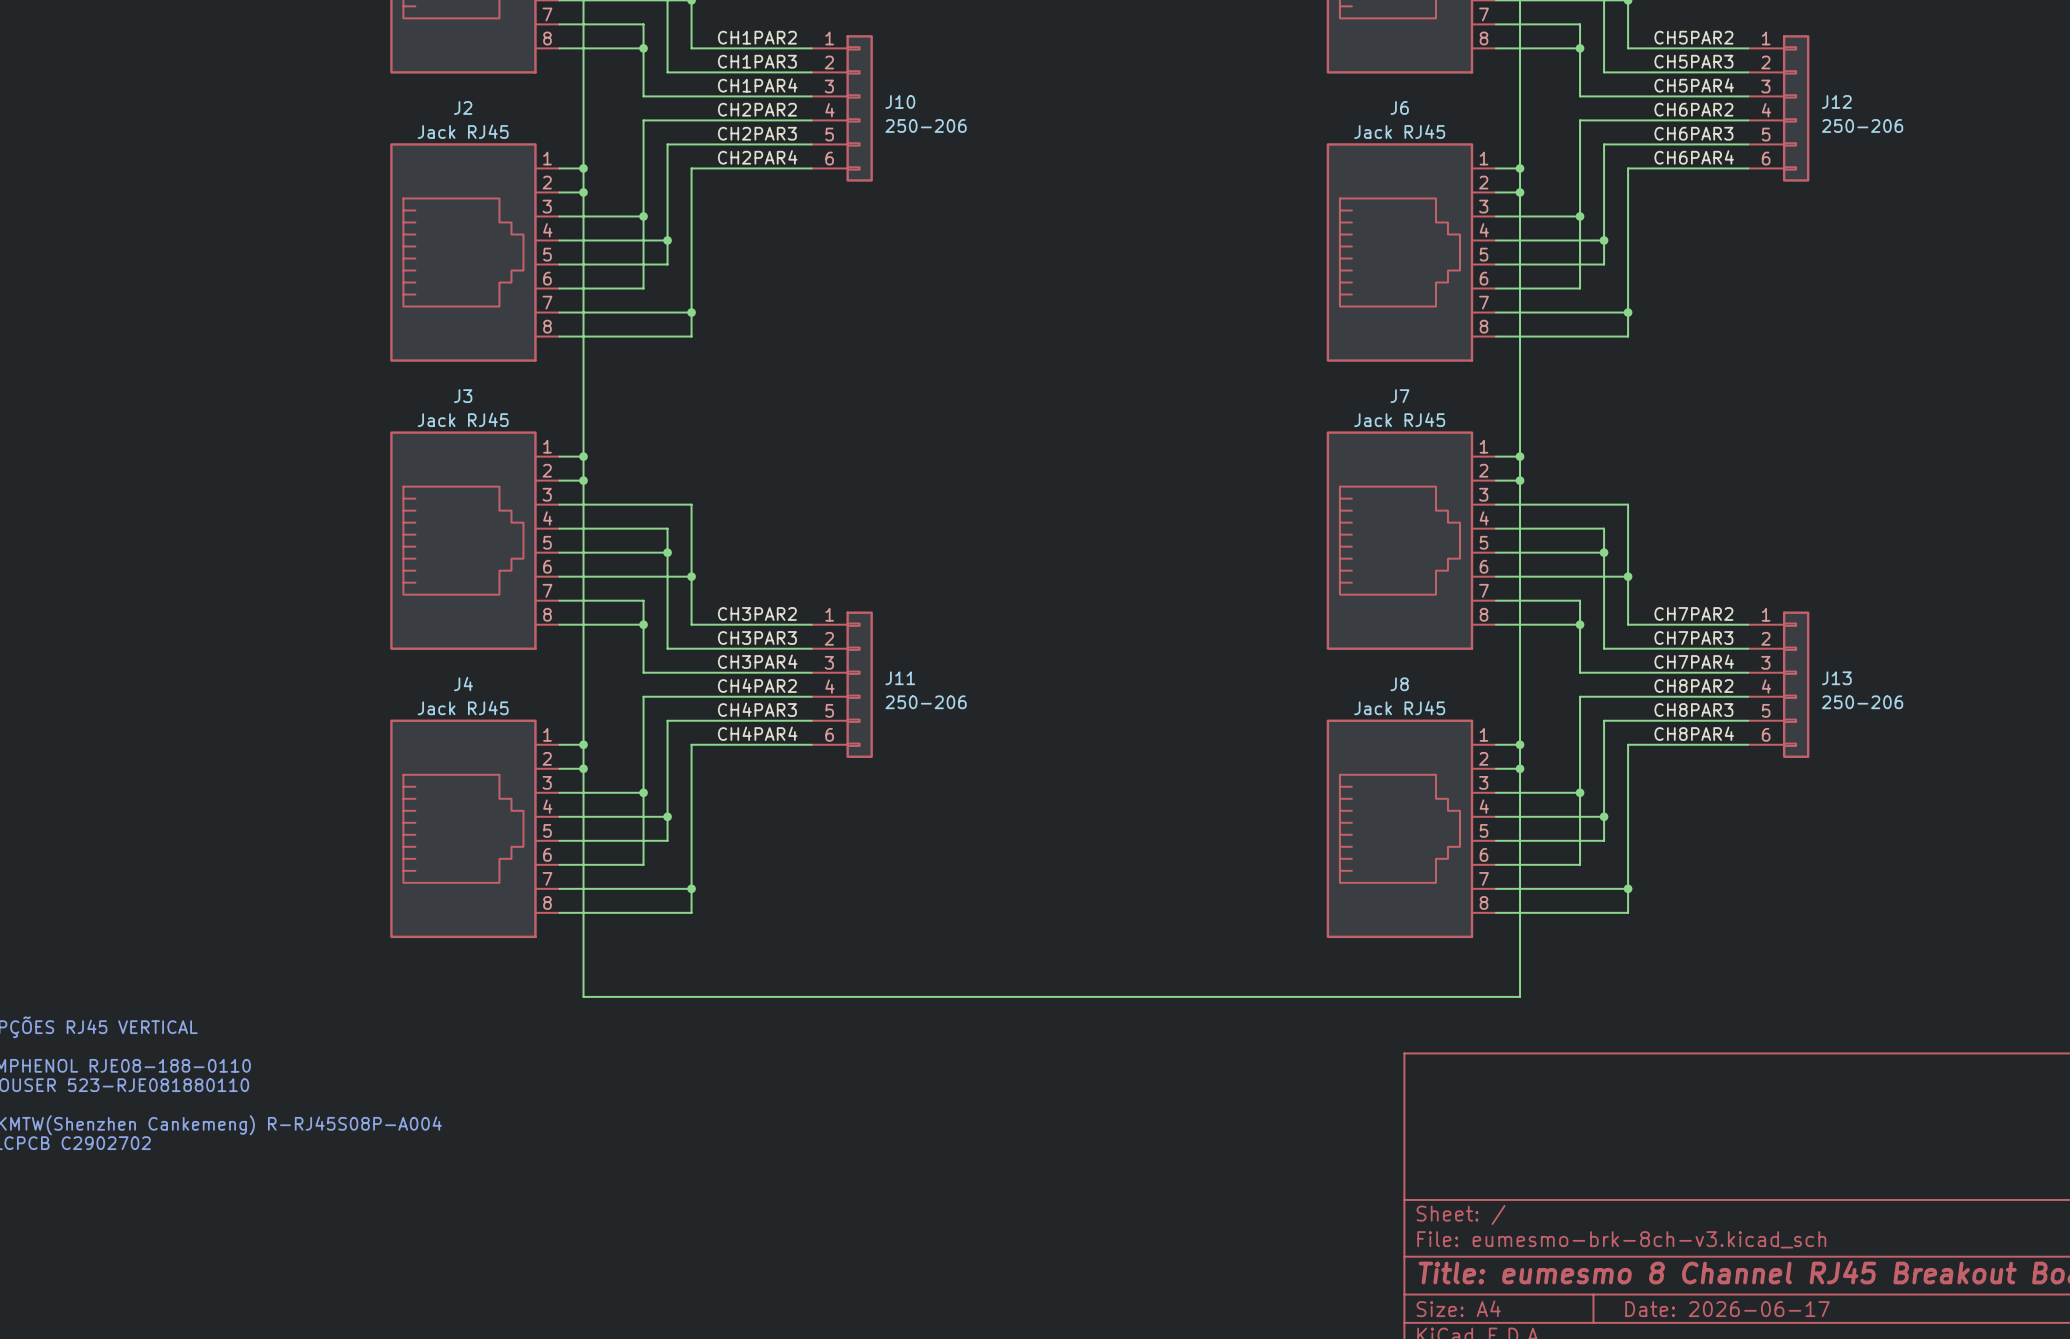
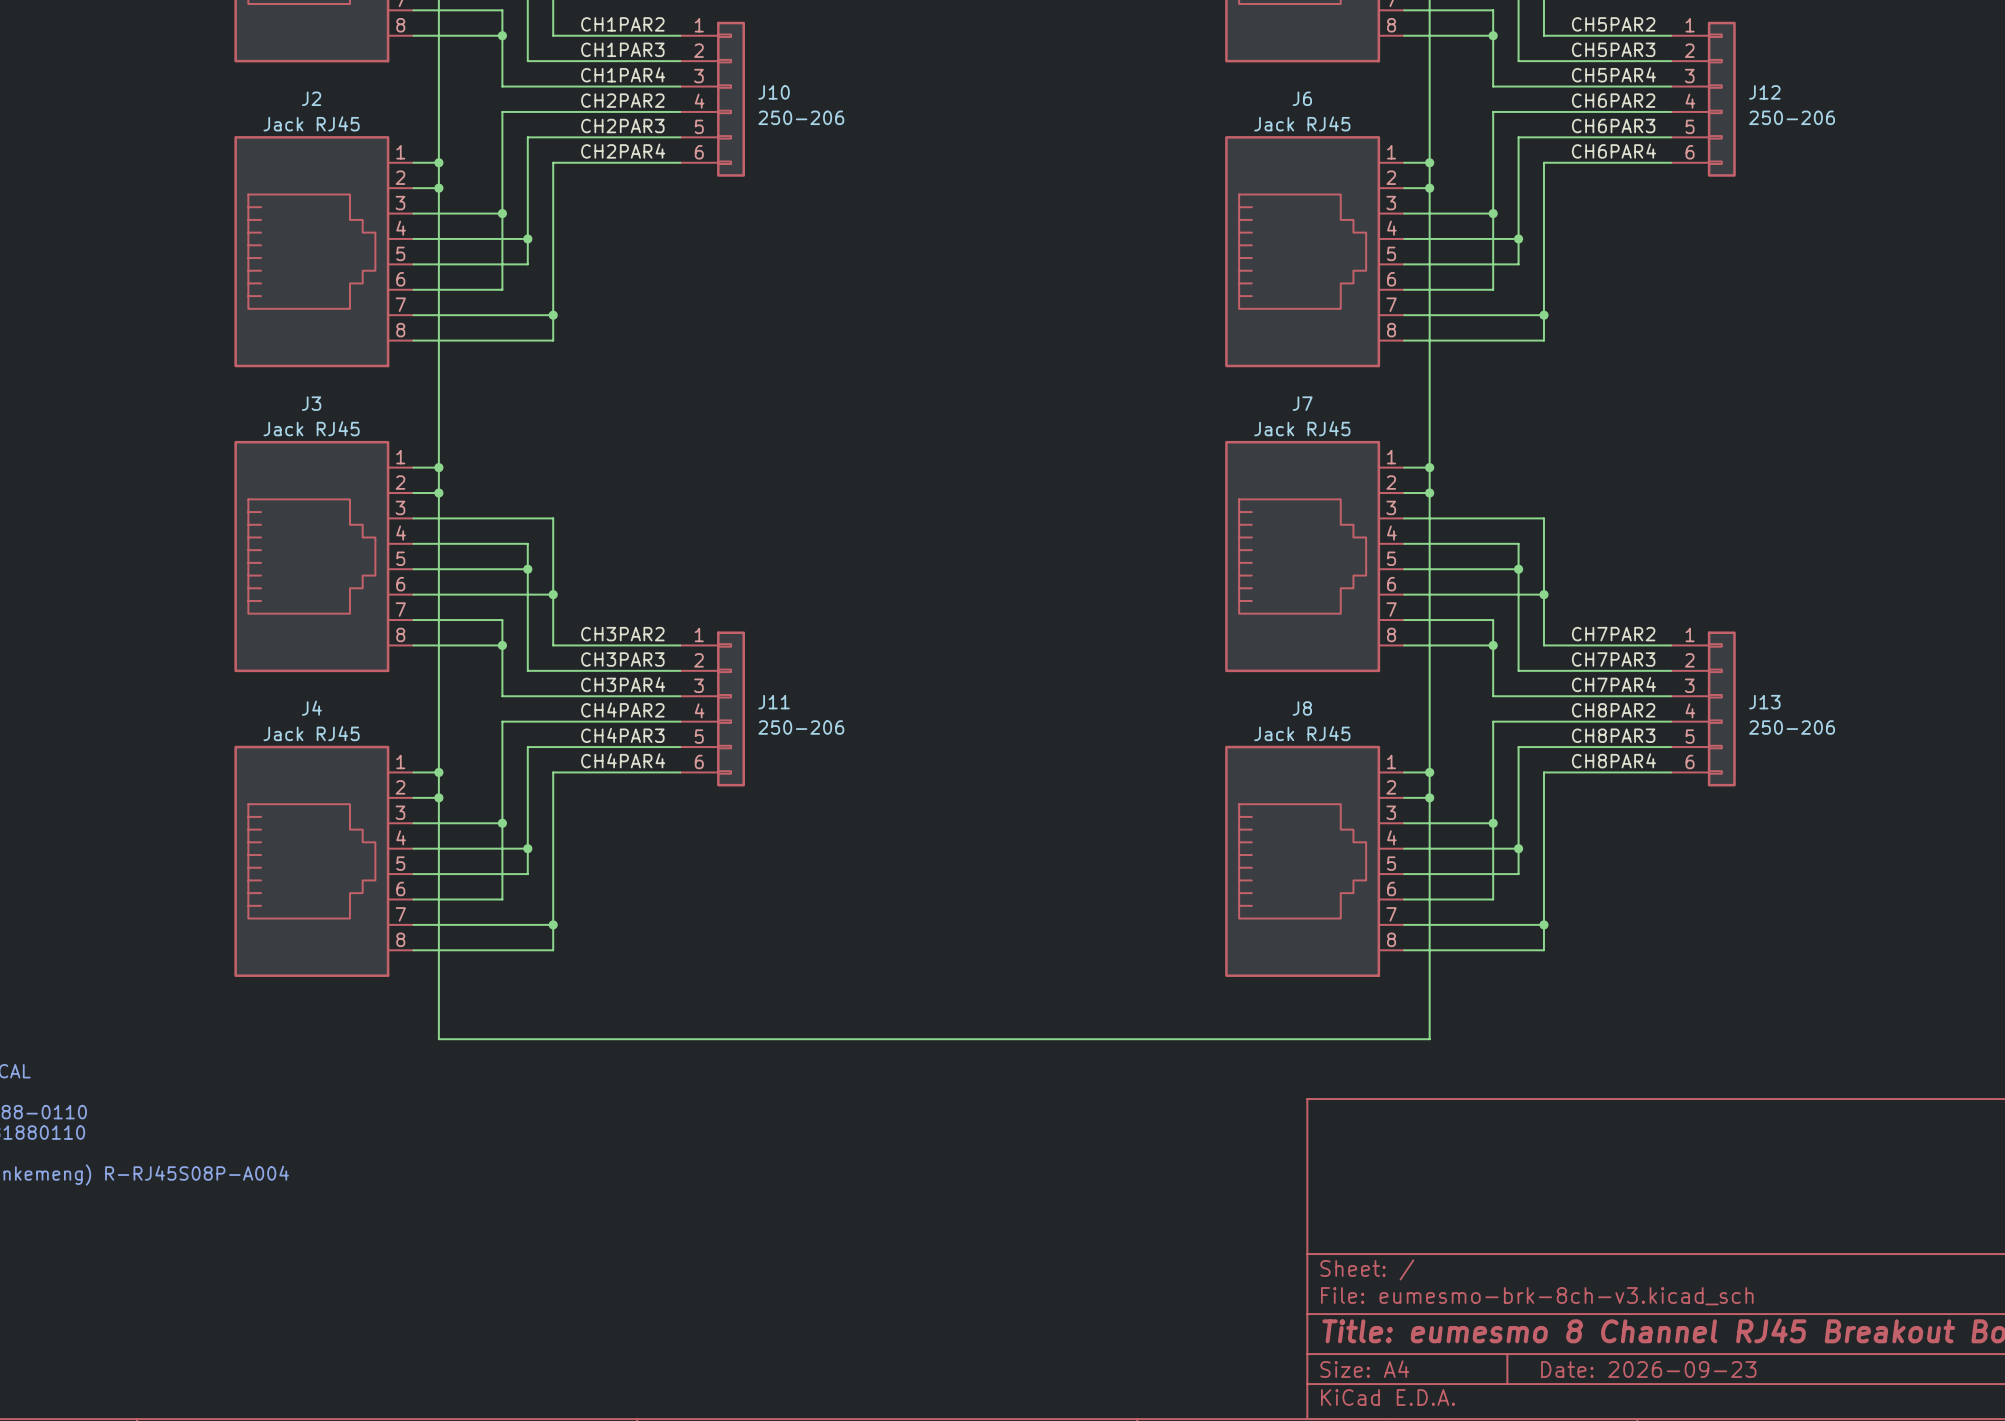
title block: Date: 2026-06-17 (1727, 1309) -> Date: 2026-09-23 (1648, 1369)

